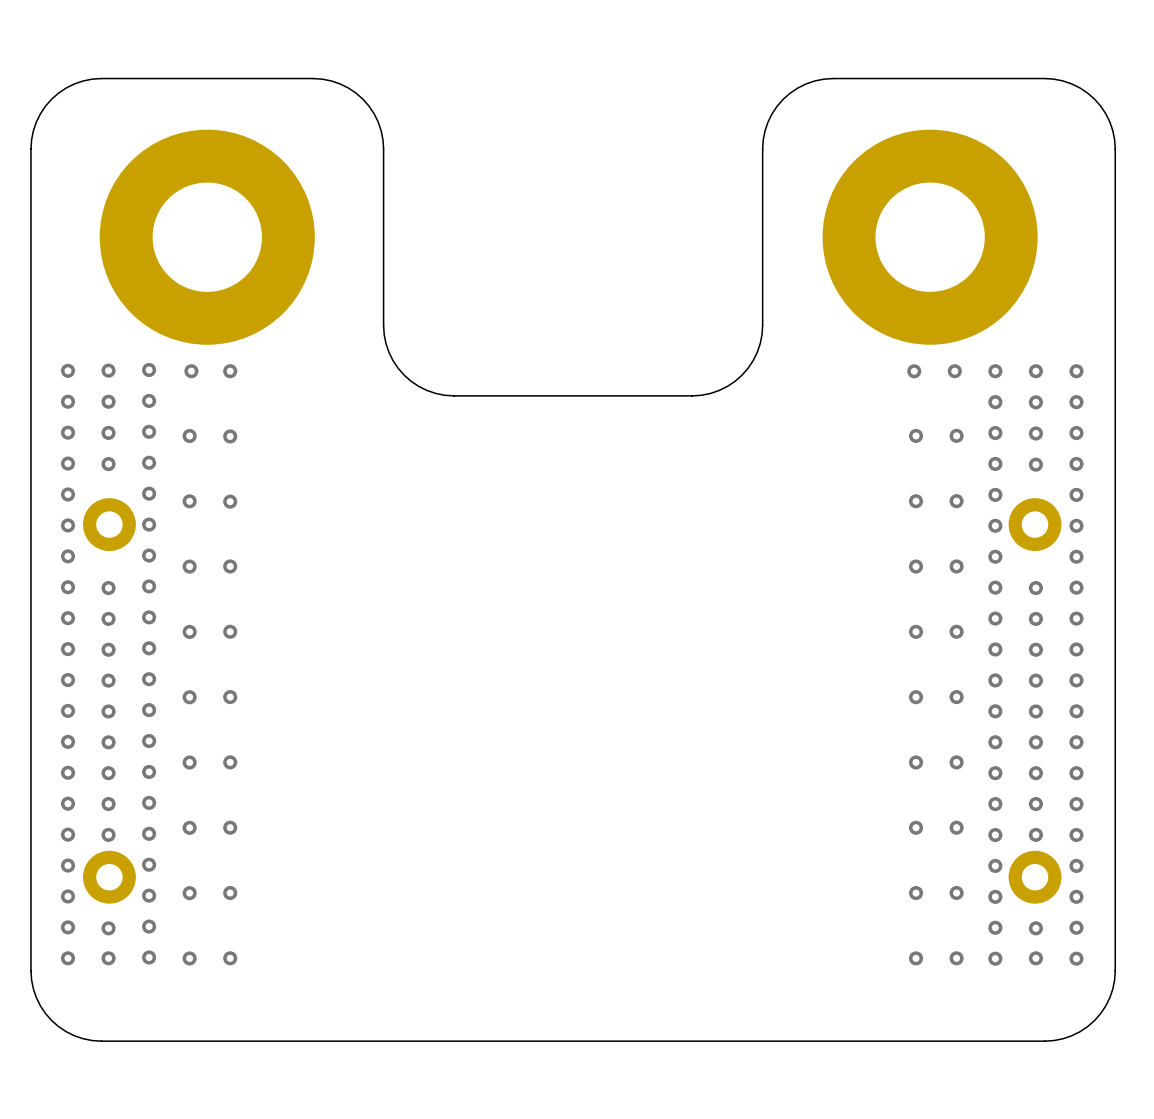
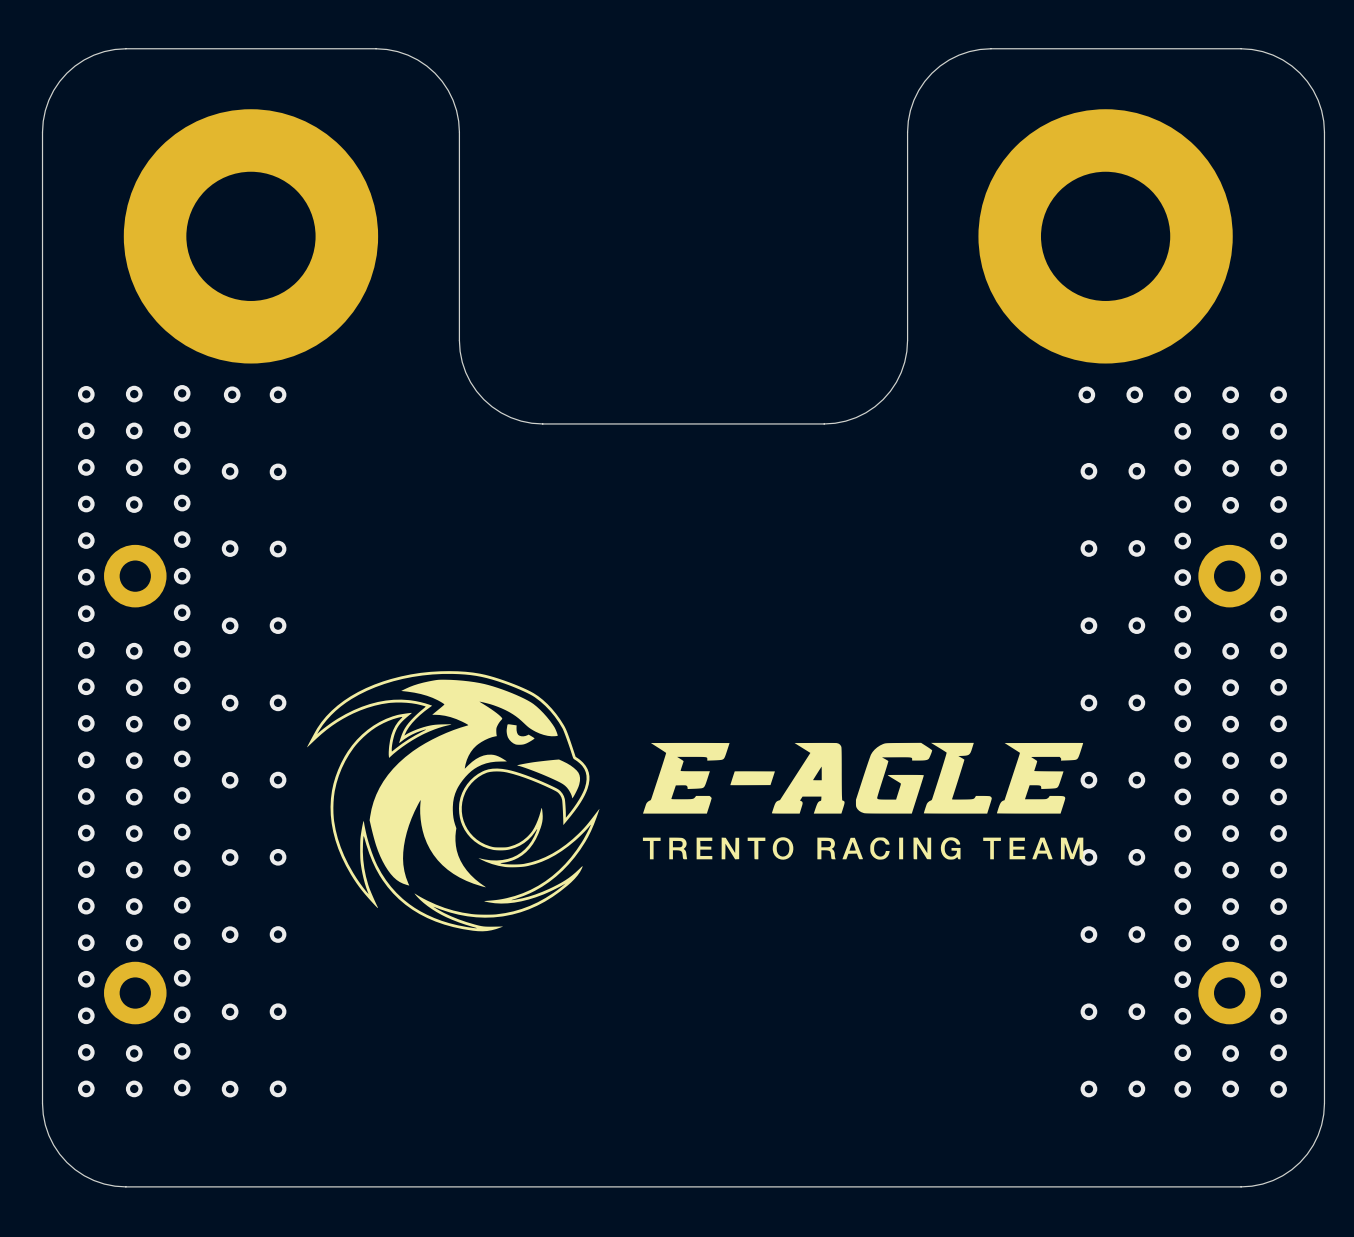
drawing: none -> [307, 671, 1084, 932]

